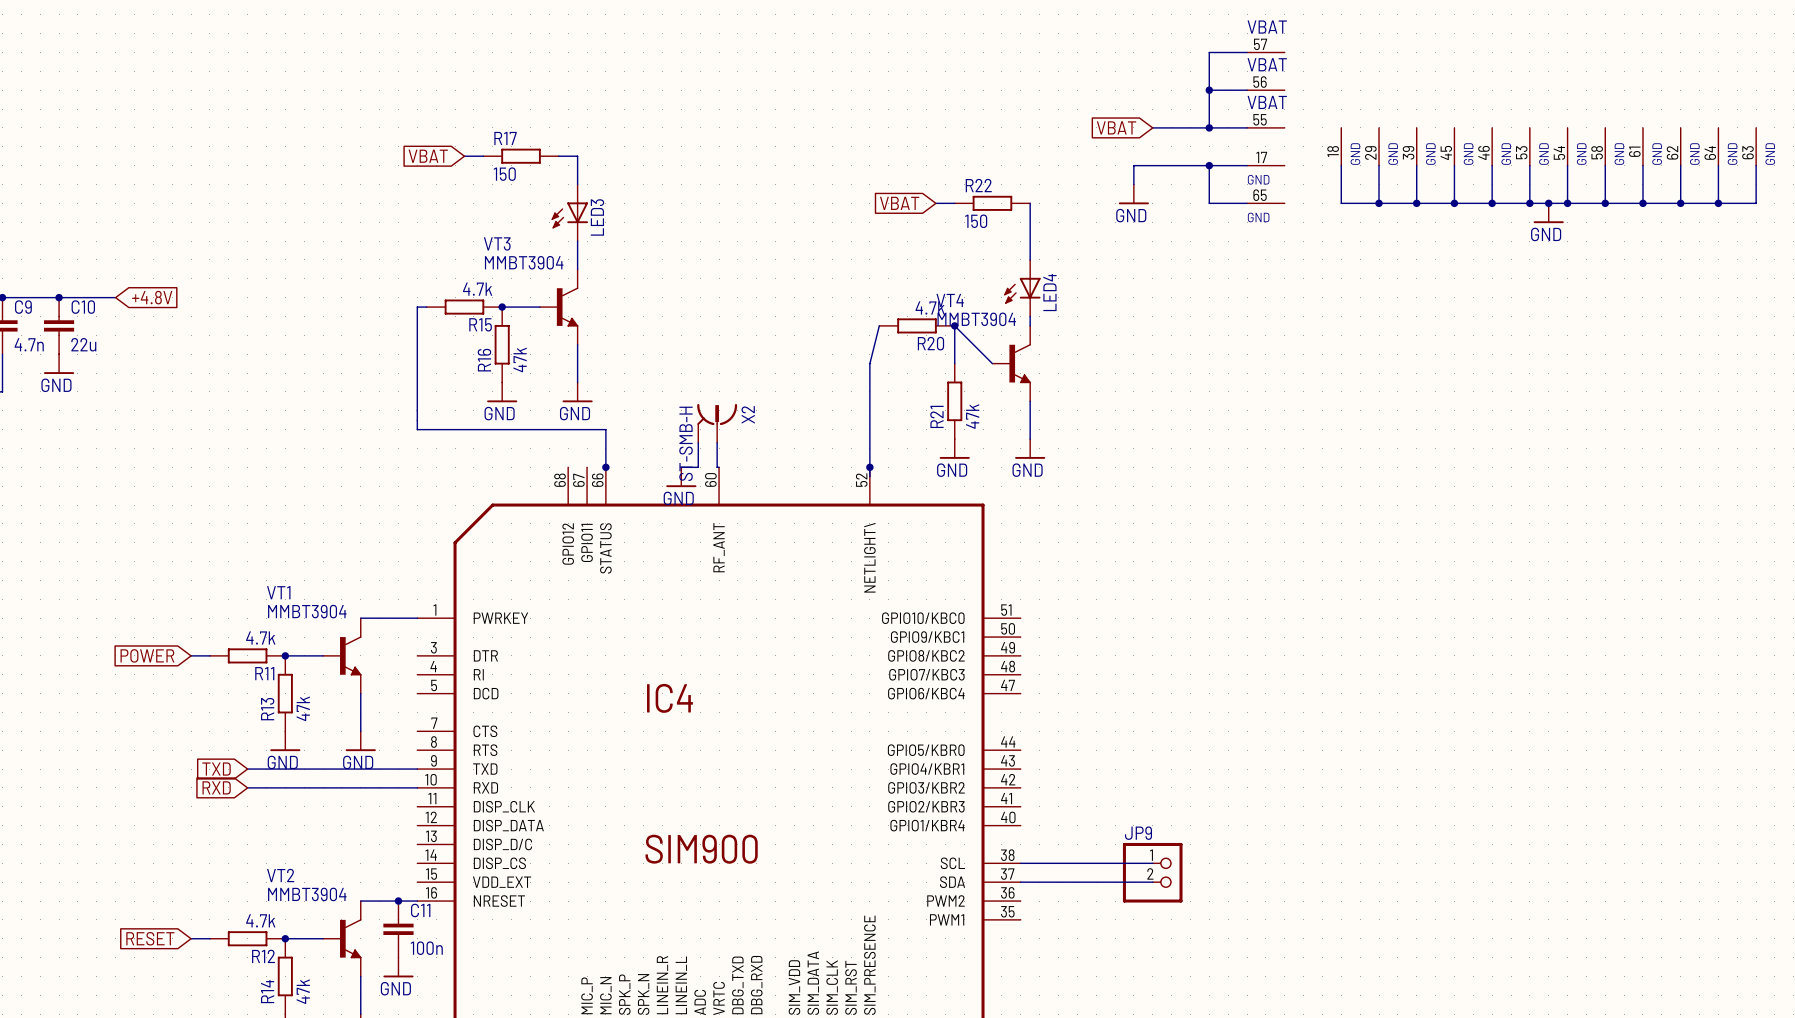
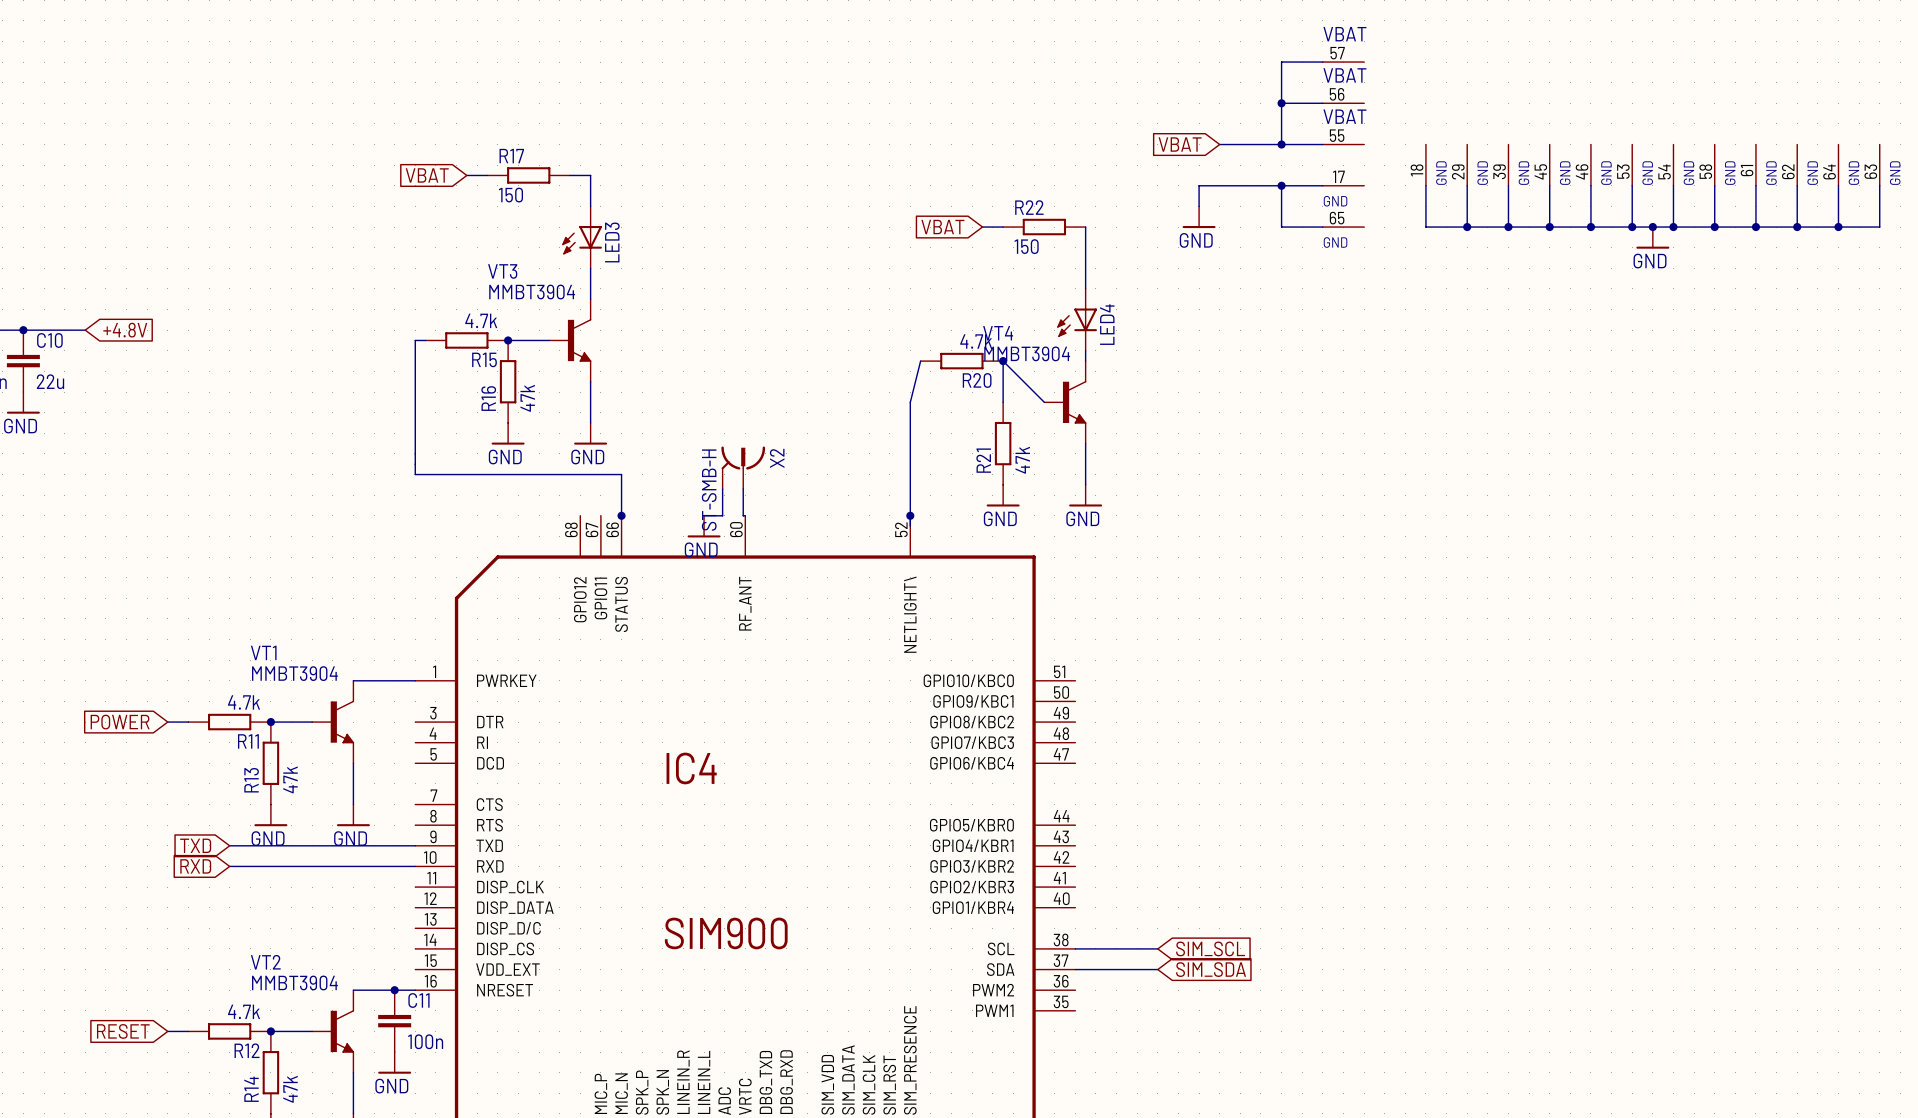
wire: (1096, 863) (1152, 863) -> none
global label: none -> SIM_SCL (1210, 948)
JP9: (1152, 872) -> none
wire: (1096, 882) (1152, 882) -> none
global label: none -> SIM_SDA (1211, 969)

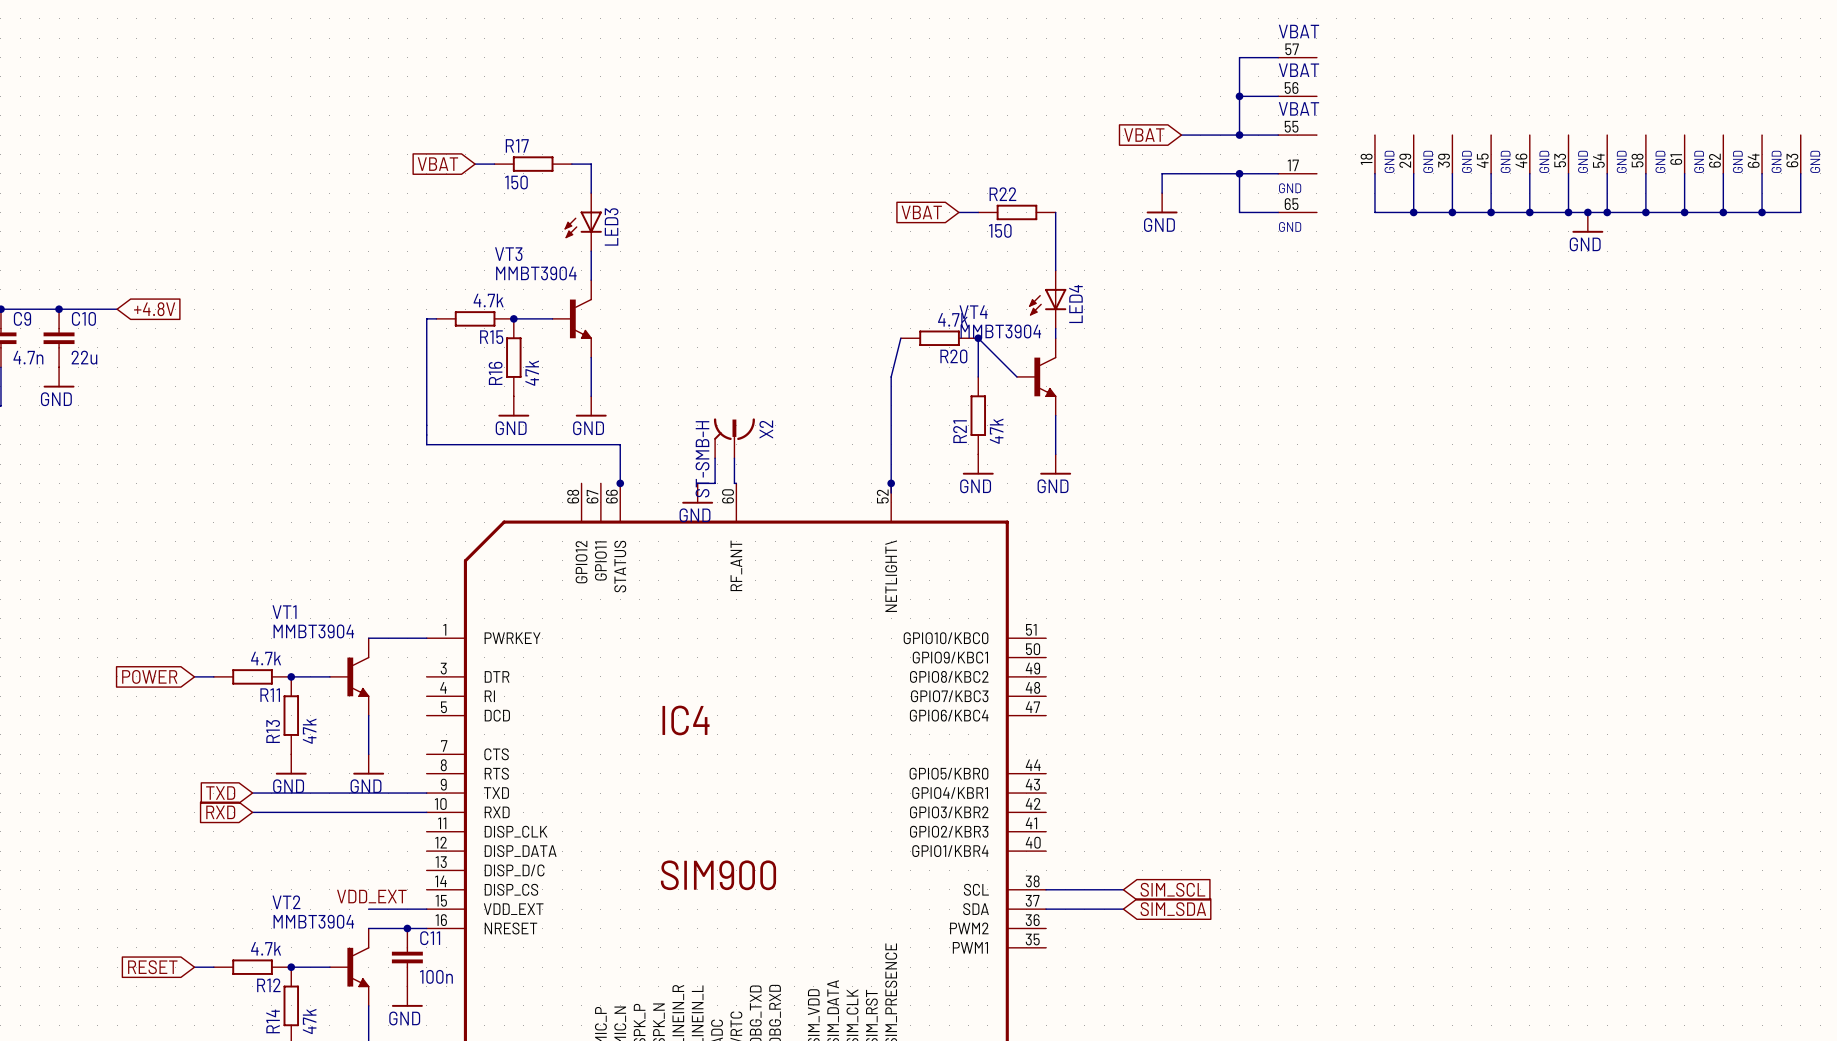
label: none -> VDD_EXT (371, 896)
wire: none -> (368, 909) (426, 909)

